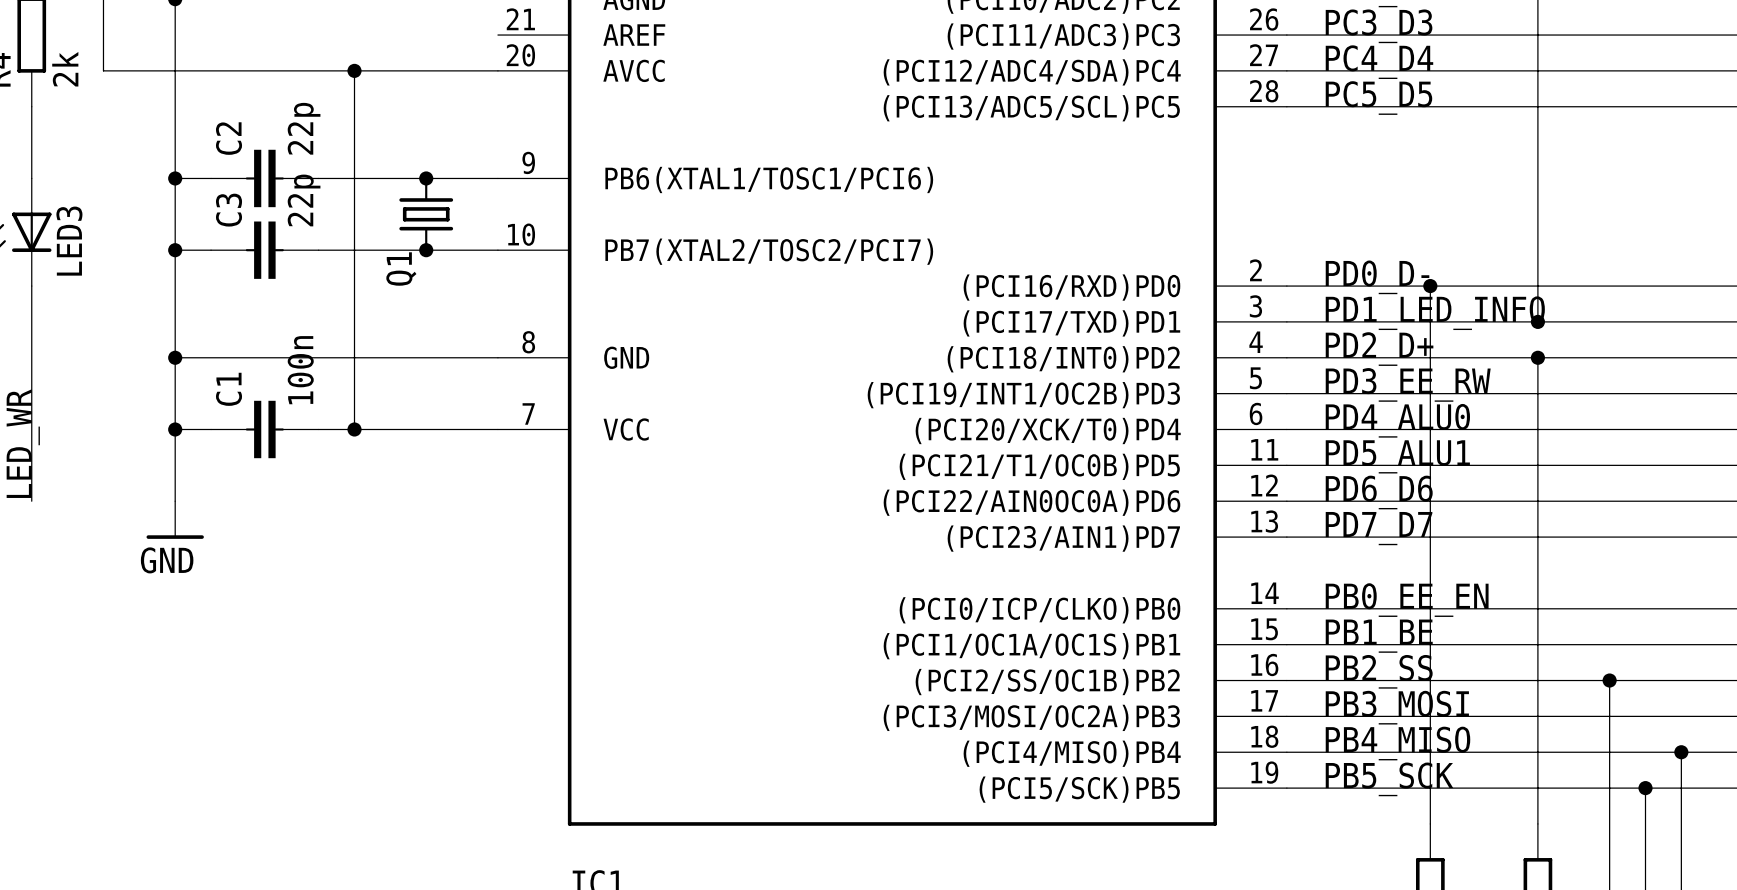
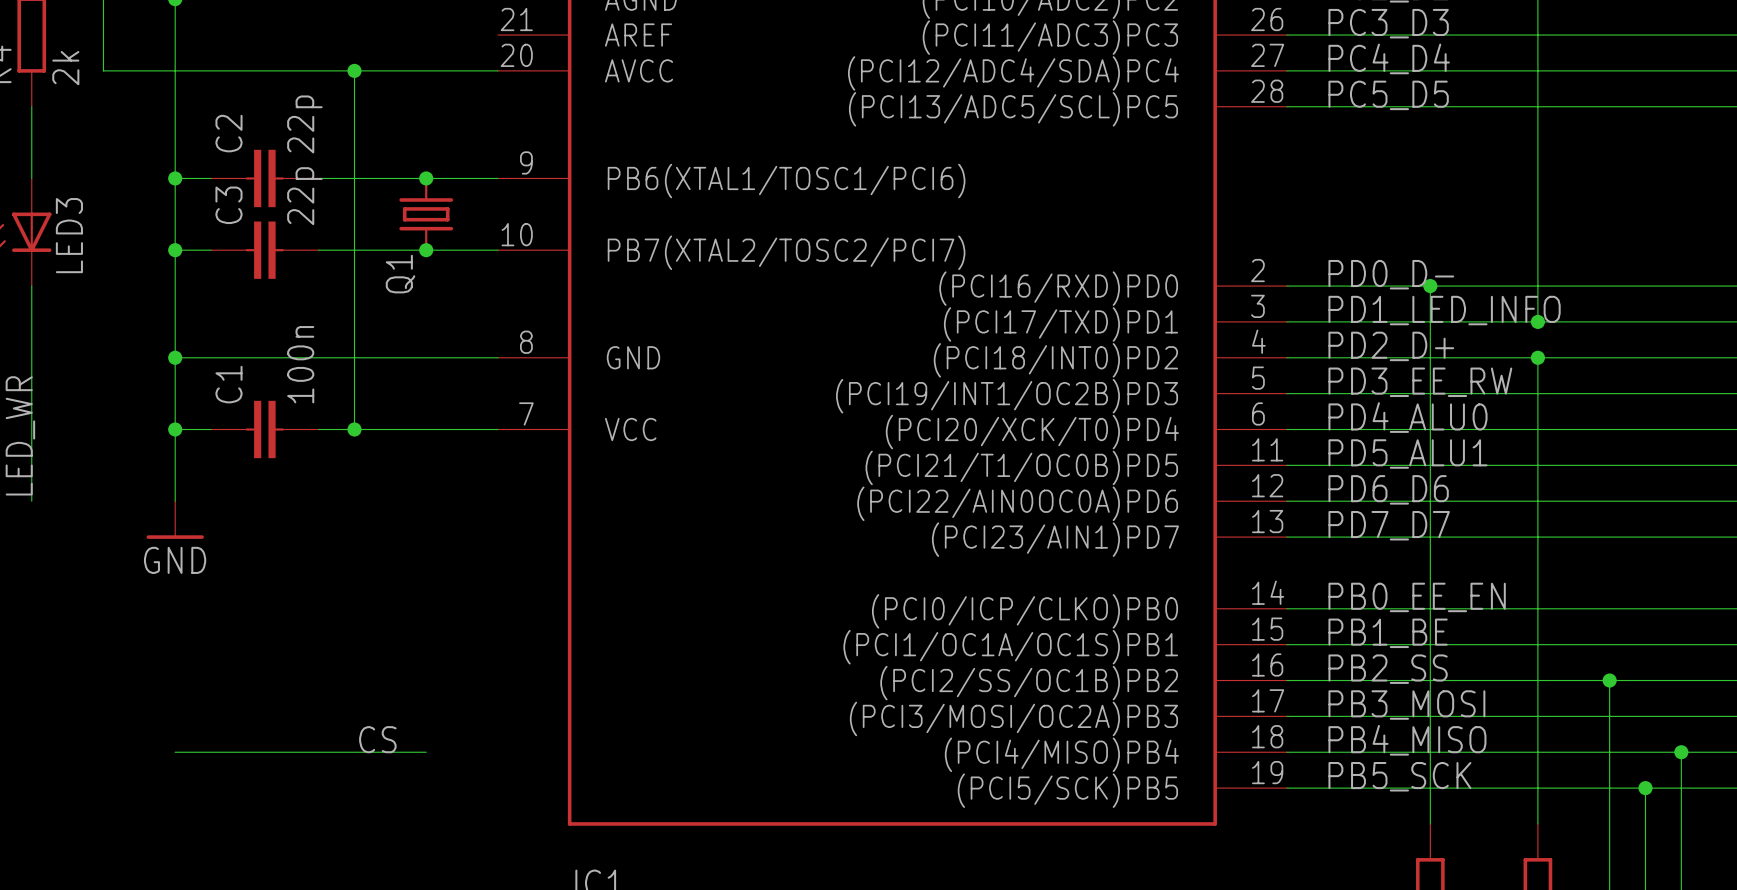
label: none -> CS (377, 739)
wire: none -> (175, 752) (426, 752)

